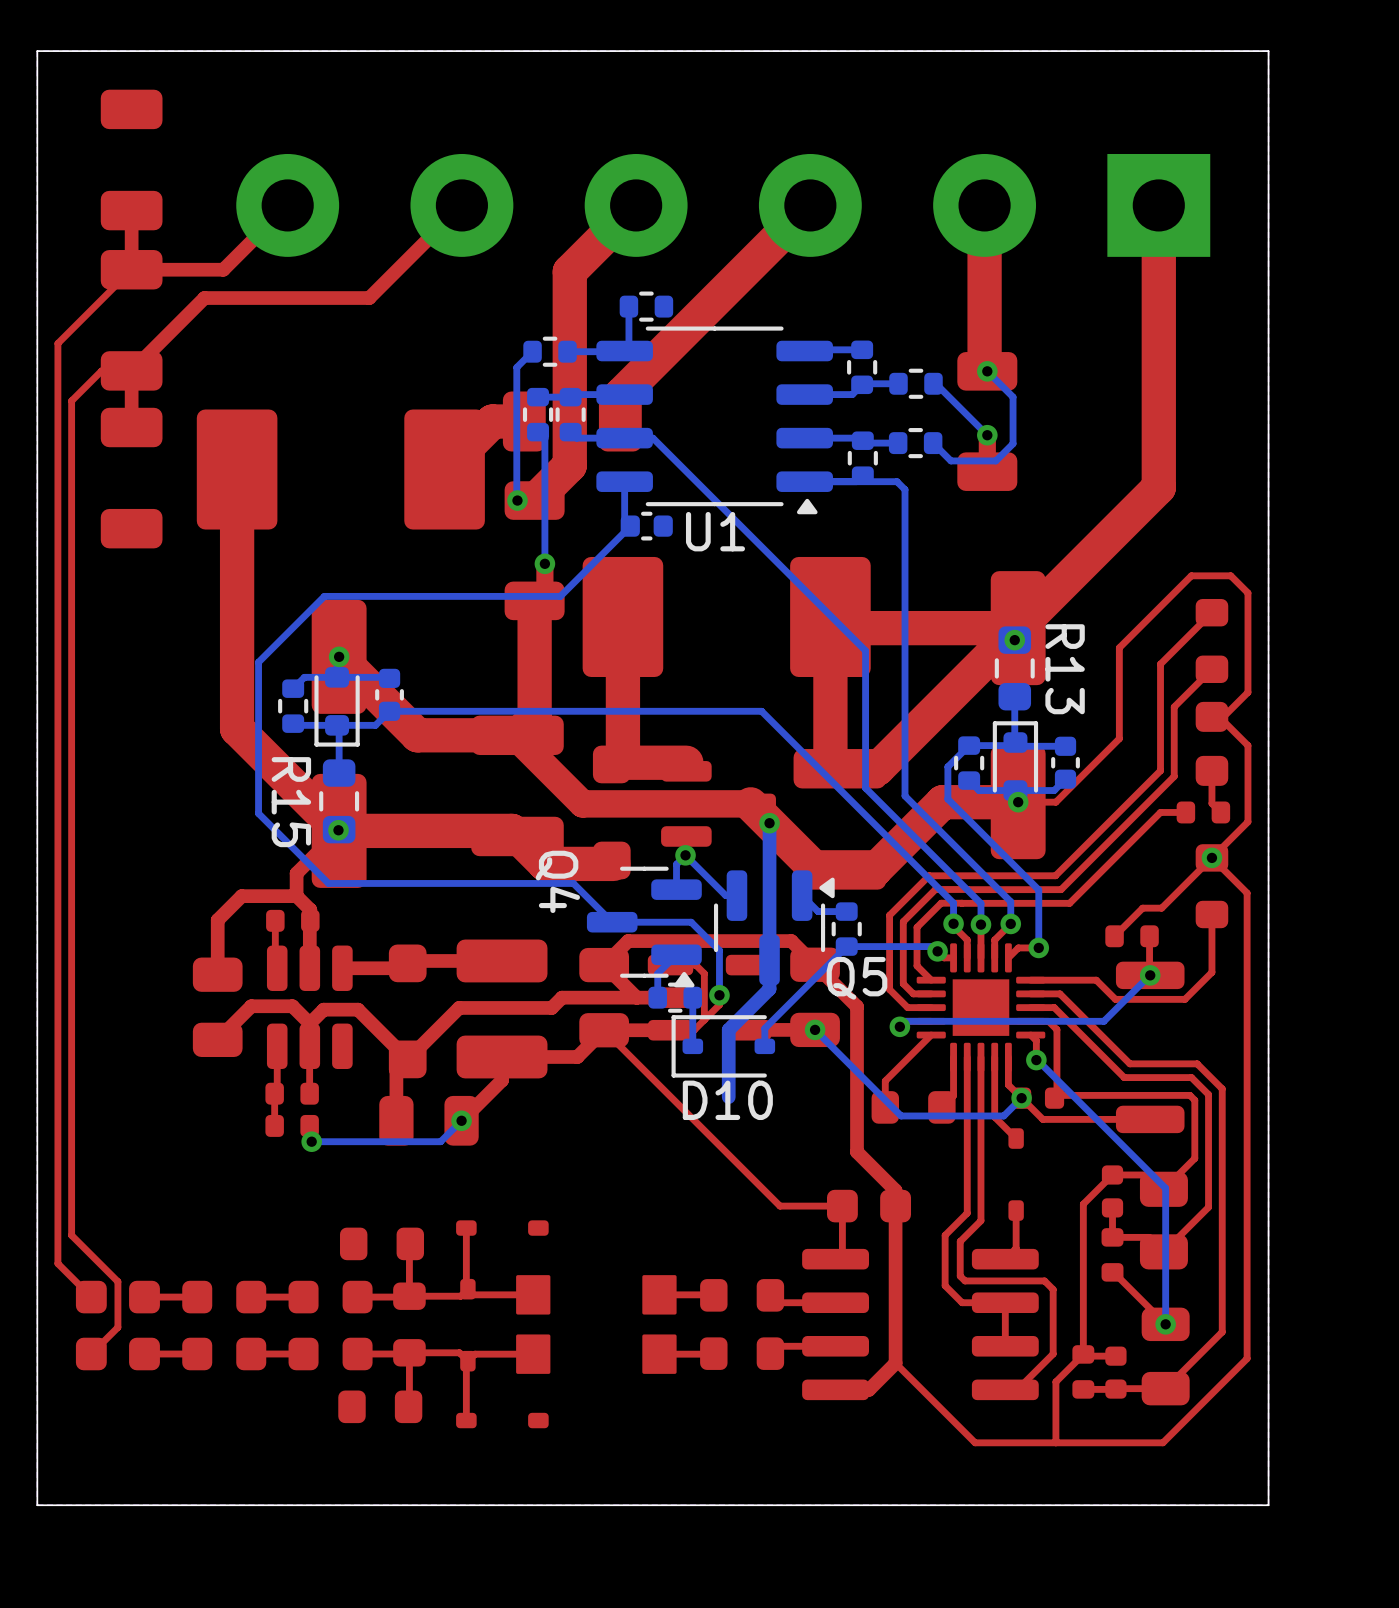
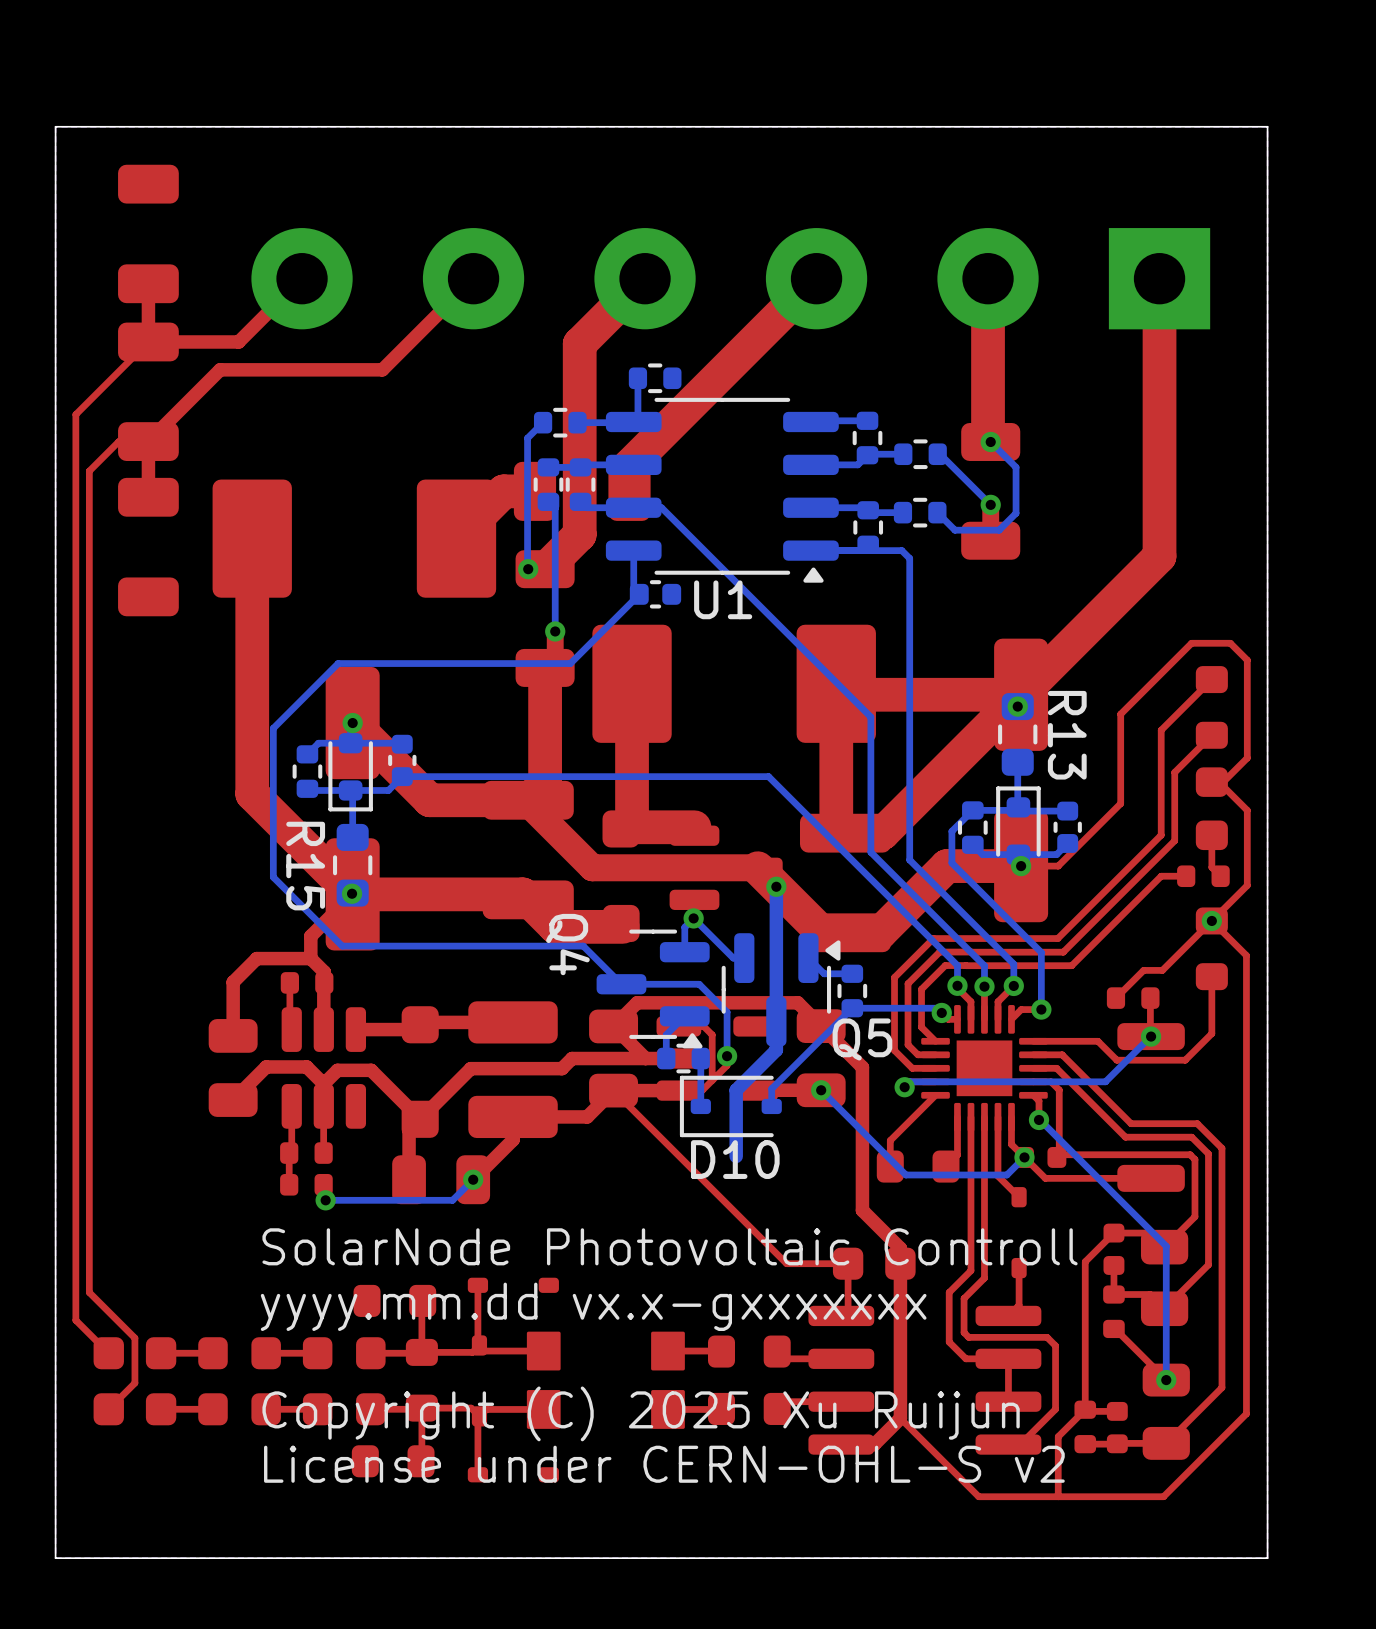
text: none -> SolarNode Photovoltaic Controll (670, 1246)
text: none -> yyyy.mm.dd vx.x-gxxxxxxx (593, 1306)
text: none -> Copyright (C) 2025 Xu Ruijun (641, 1413)
text: none -> License under CERN-OHL-S v2 (664, 1464)

